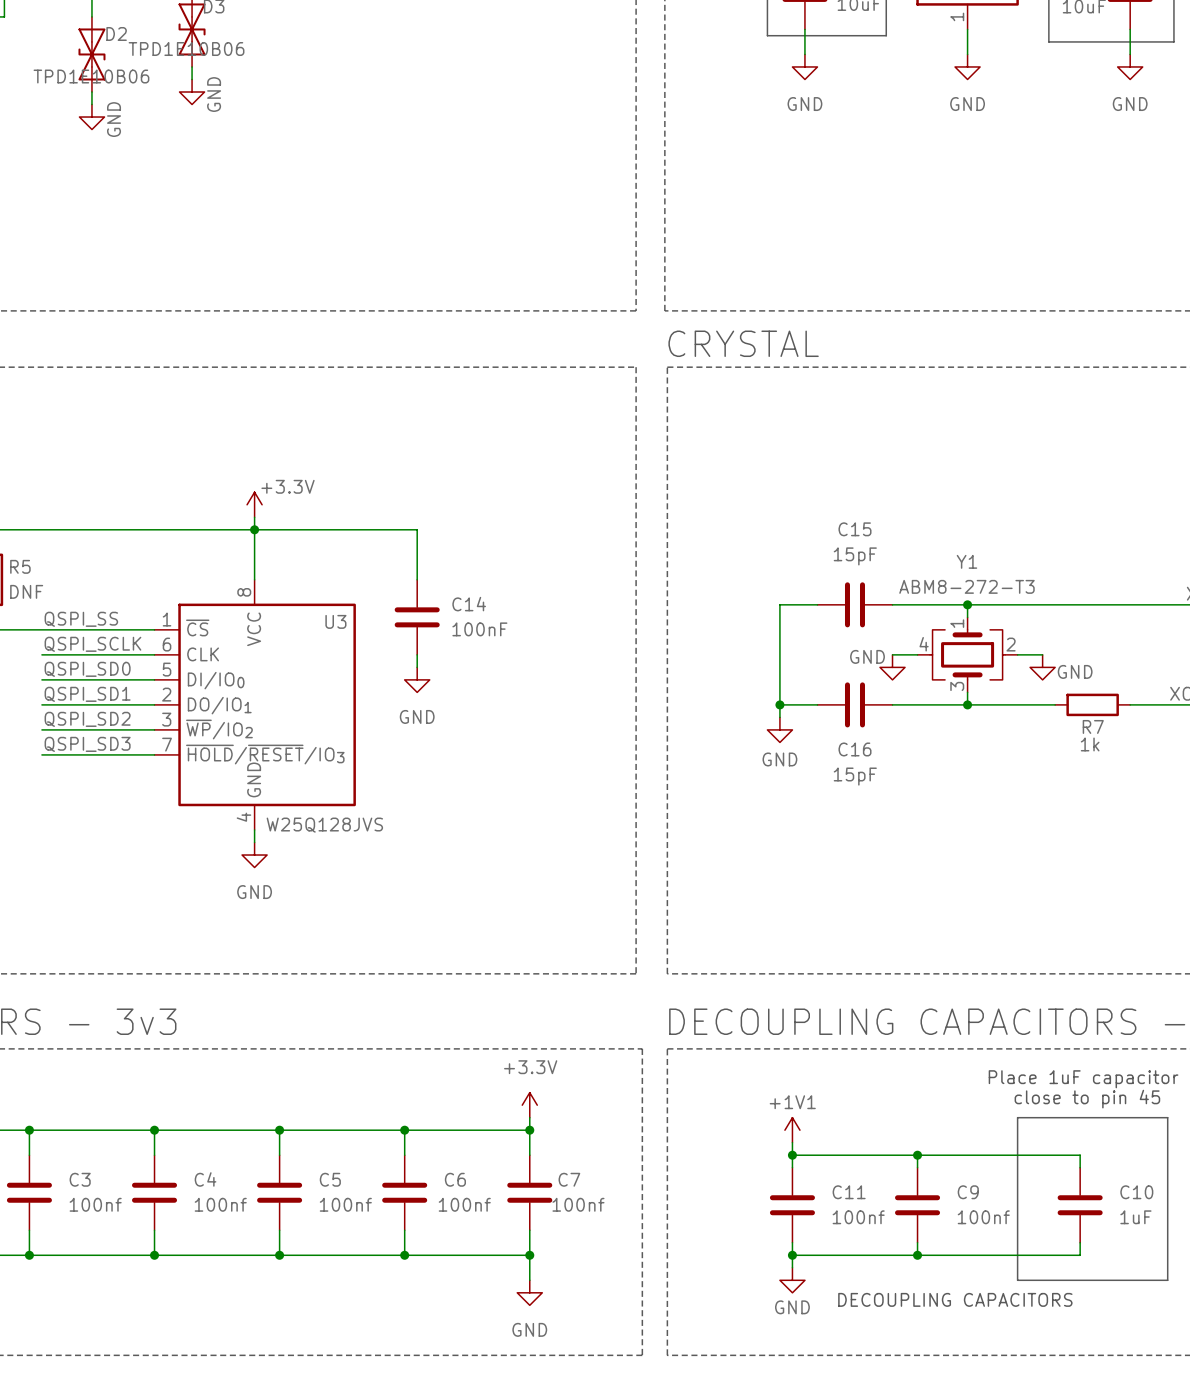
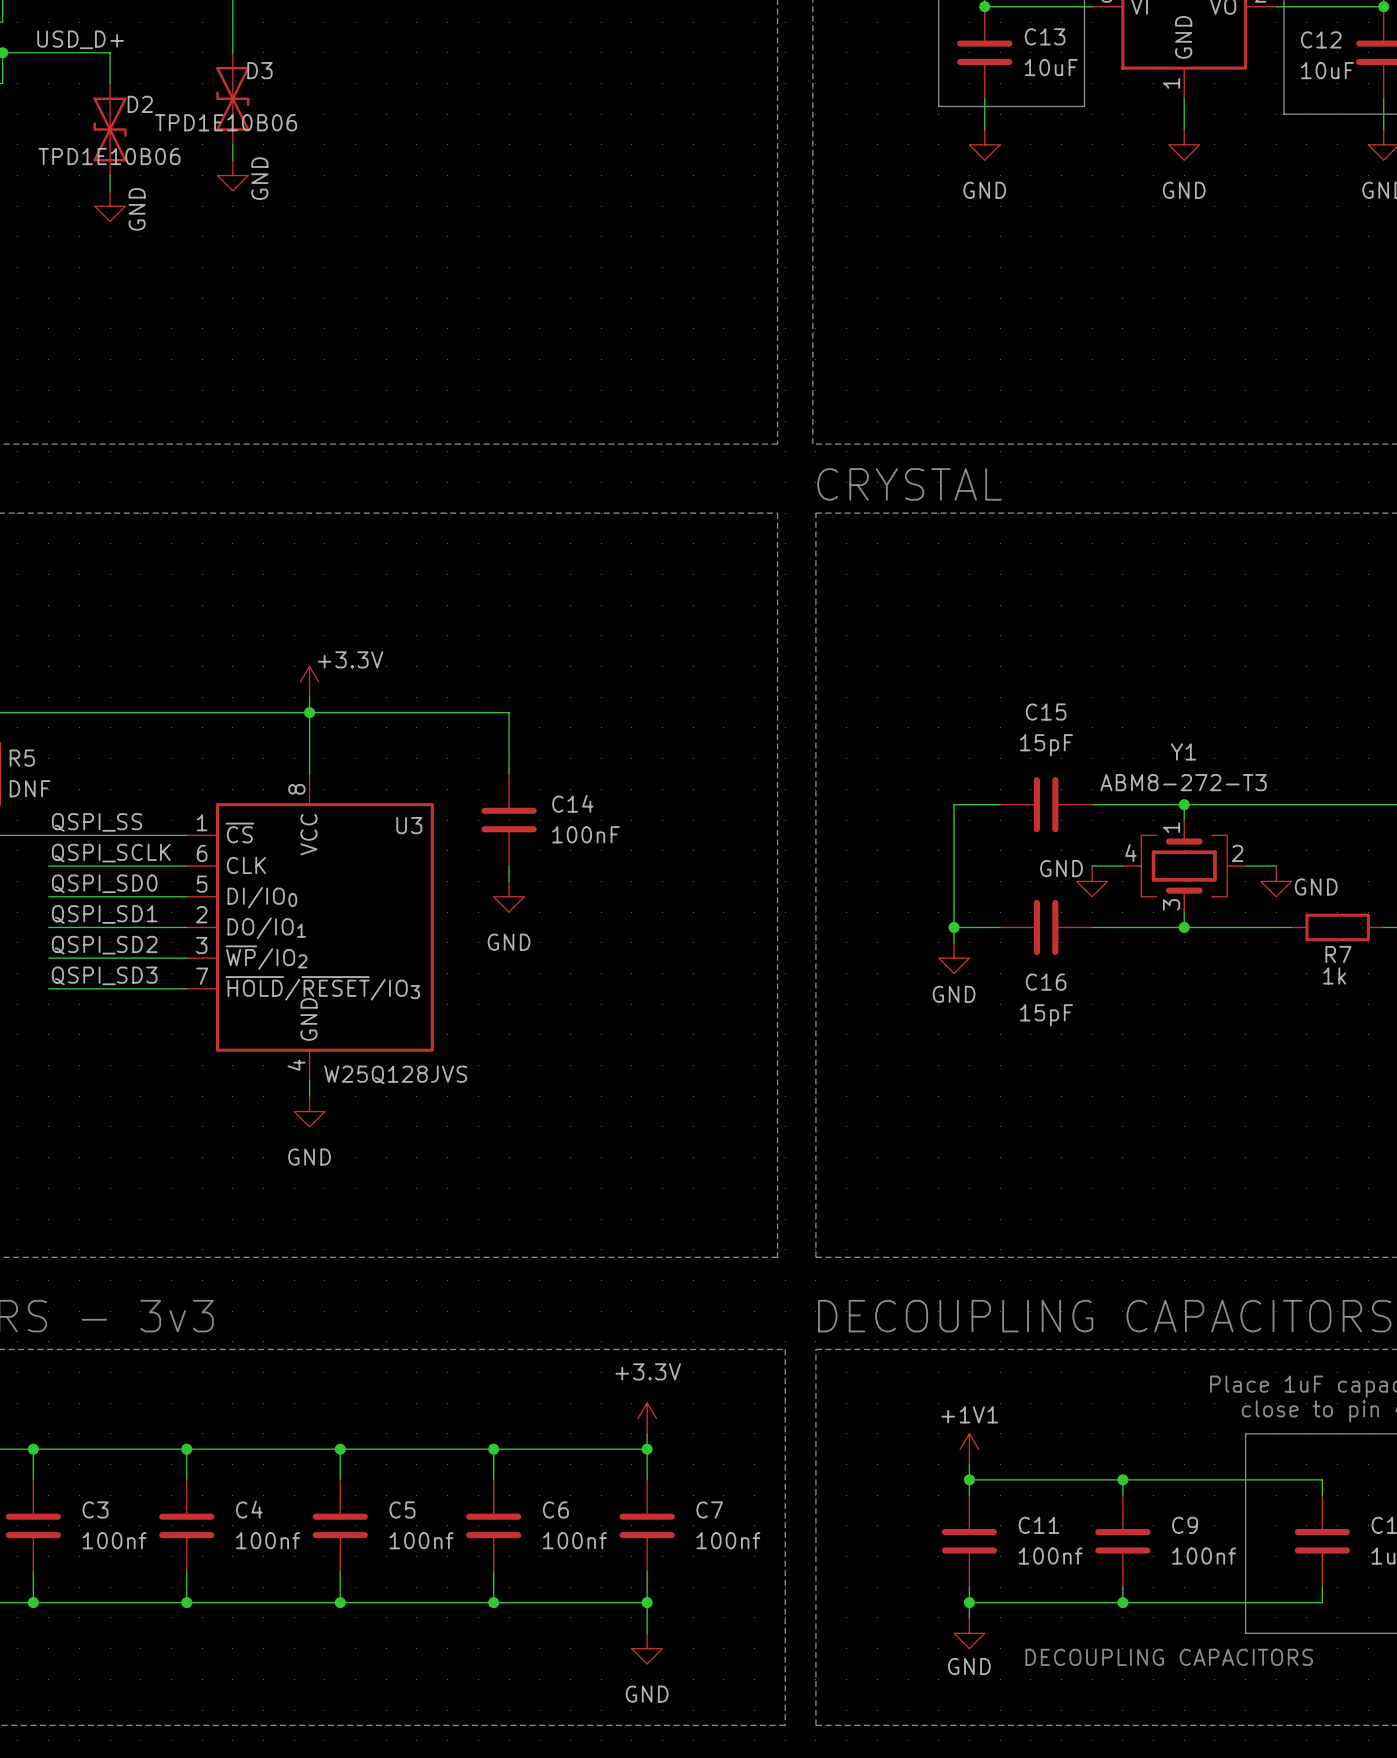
C7 name position: C7 (569, 1179) -> C7 (709, 1509)
C7 value position: 100nf (464, 1204) -> 100nf (728, 1540)
C6 value position: 100nf (578, 1204) -> 100nf (574, 1540)

